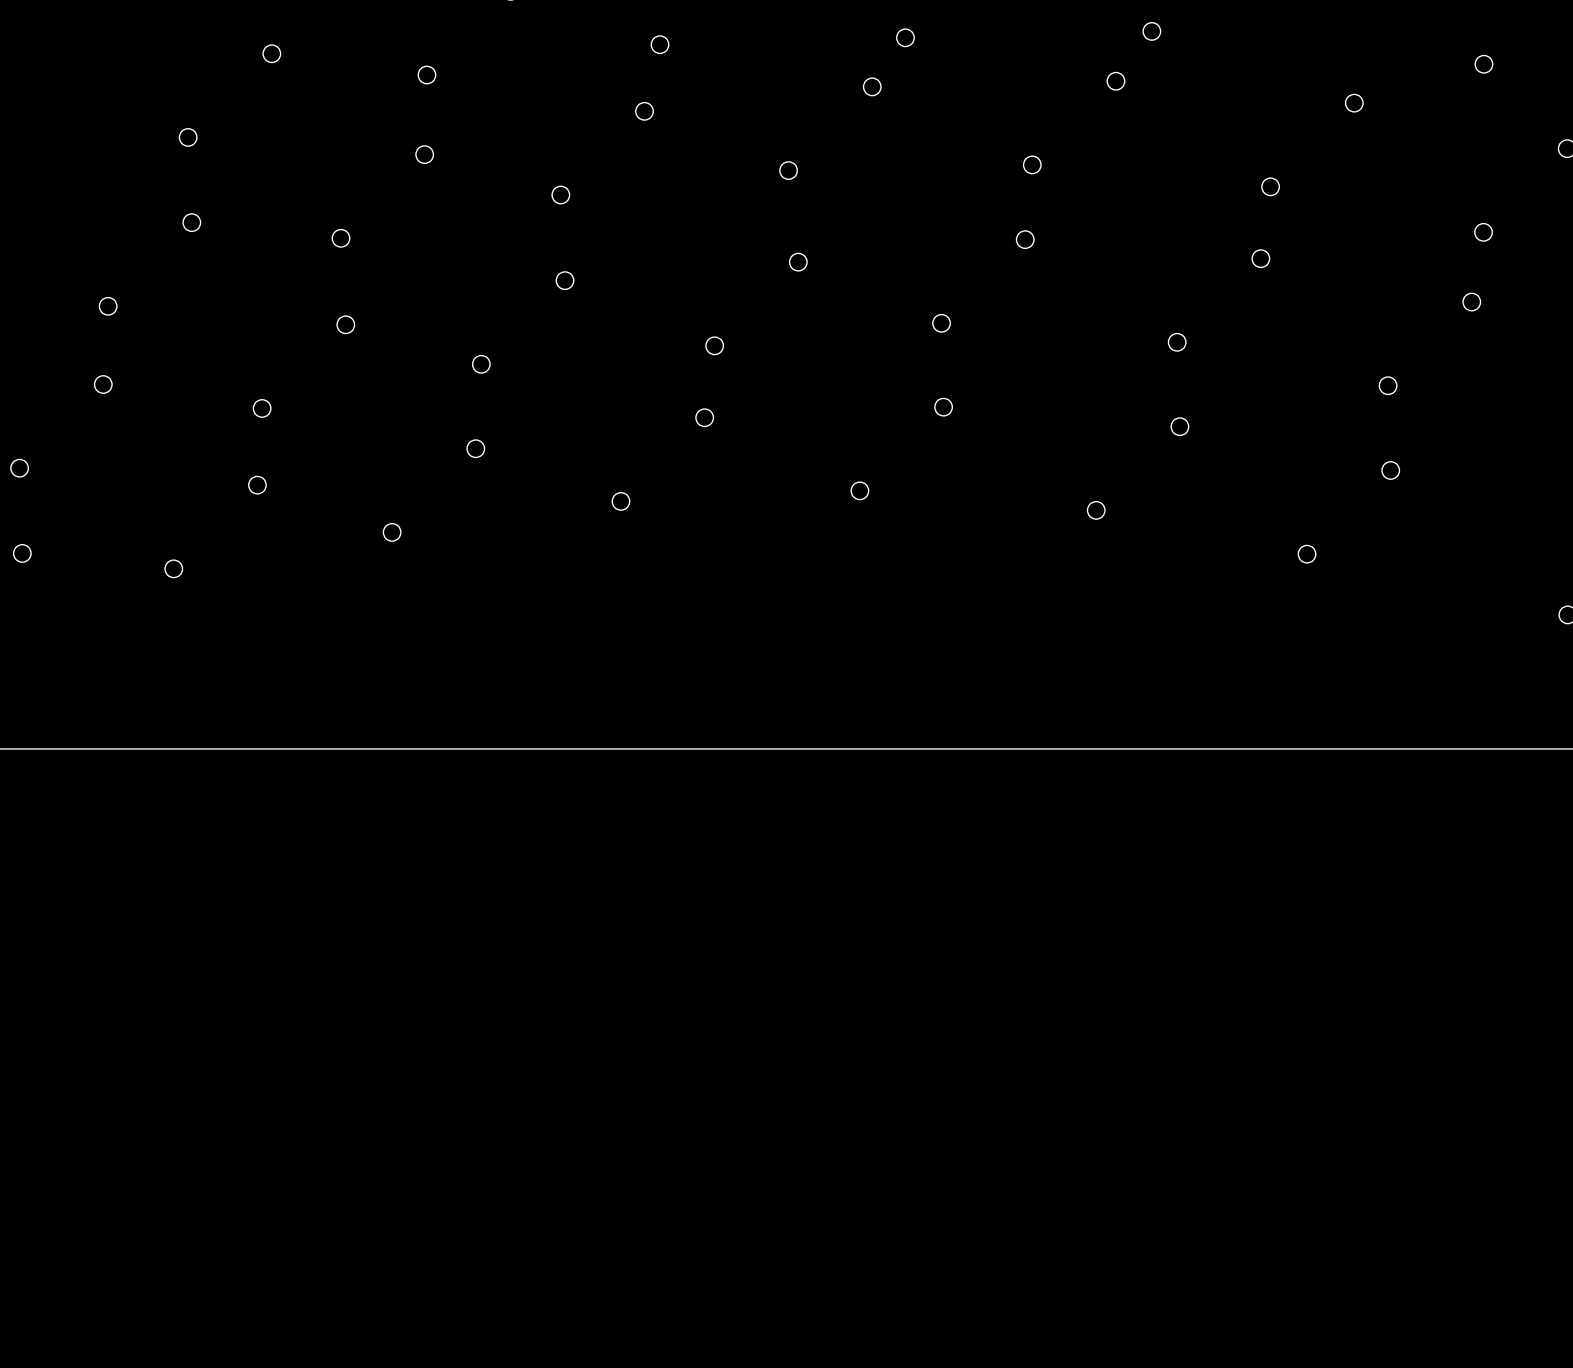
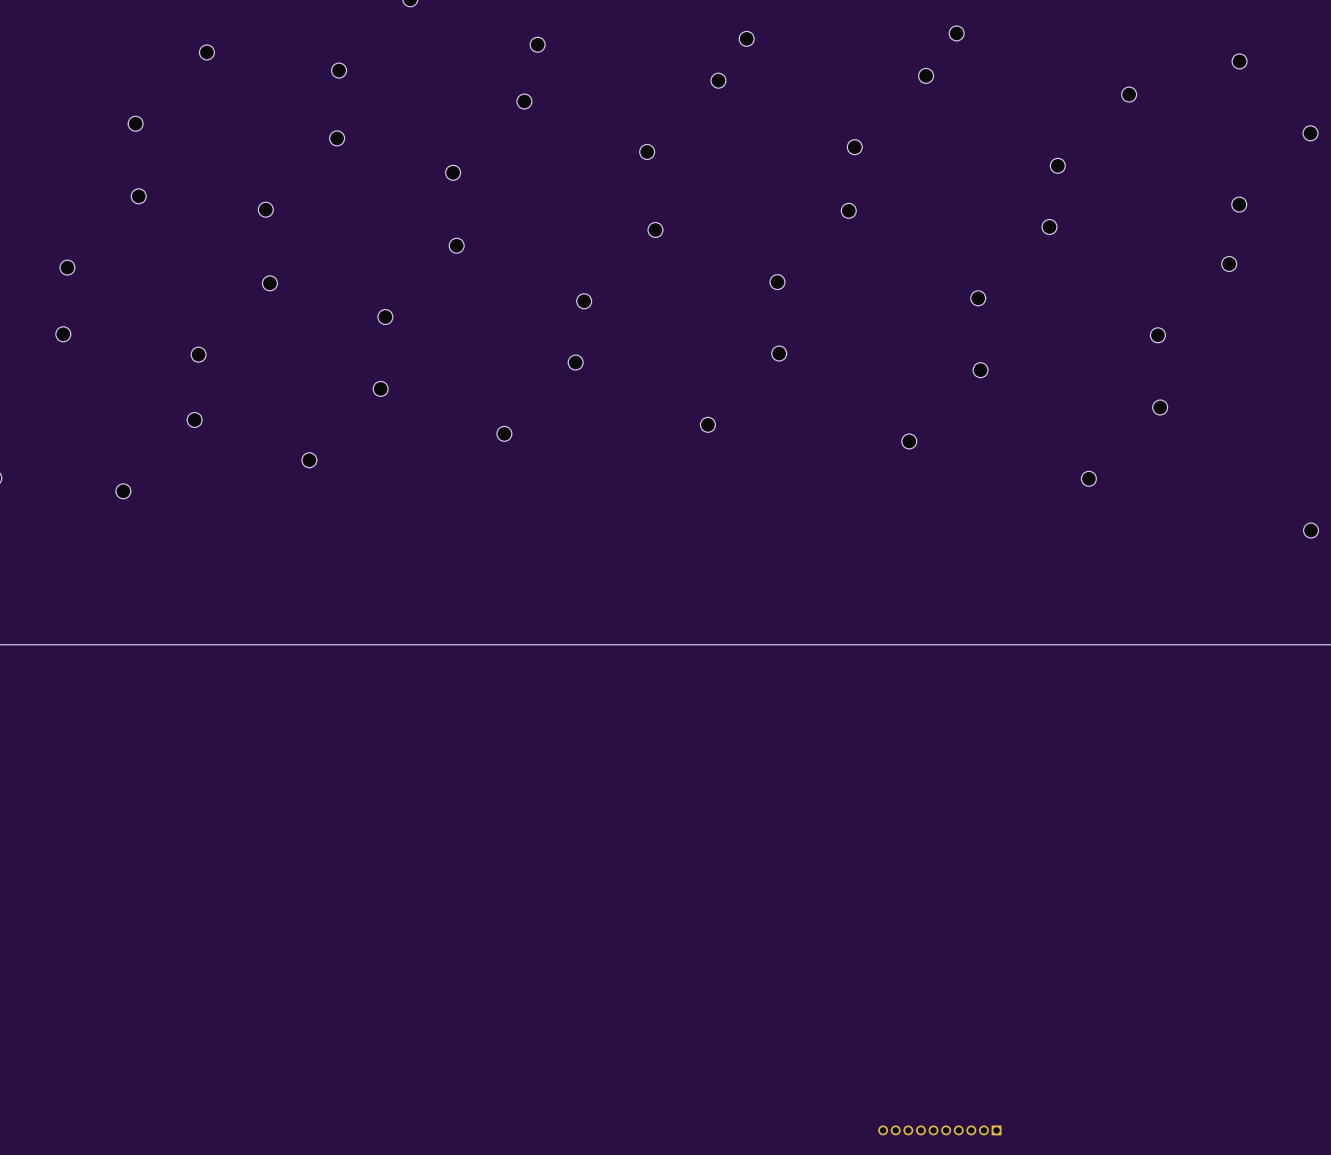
part: none -> (939, 1130)

